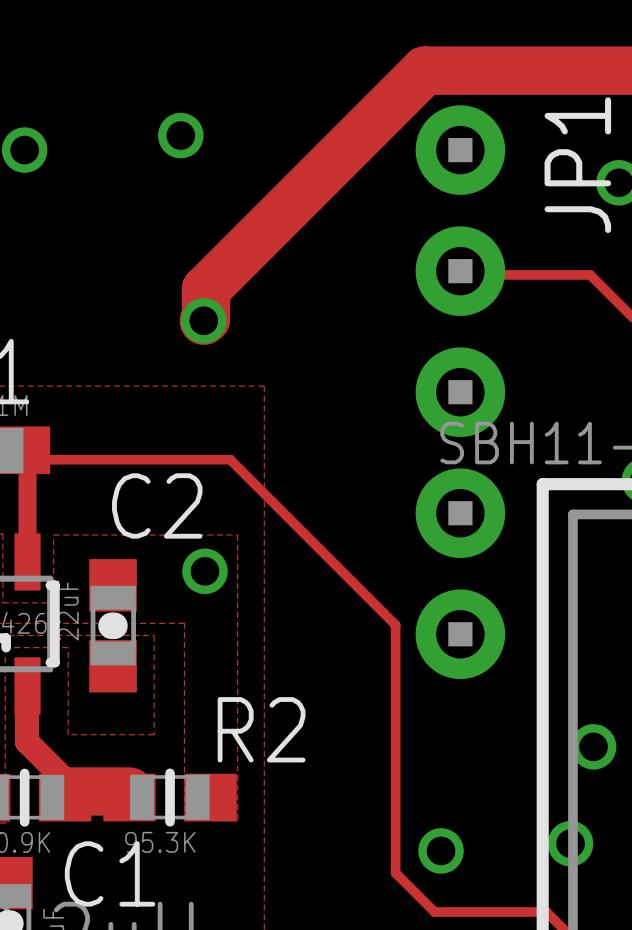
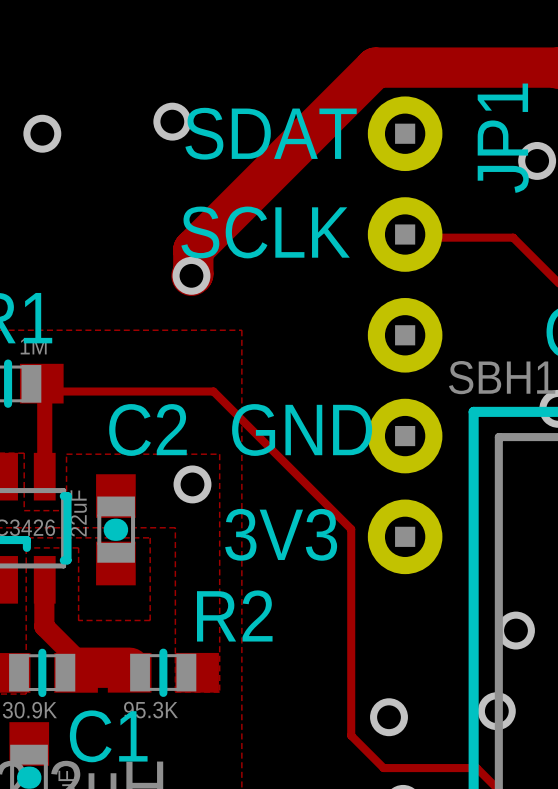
text: none -> SDAT (271, 133)
text: none -> SCLK (265, 232)
text: none -> GND (302, 430)
text: none -> 3V3 (281, 534)

